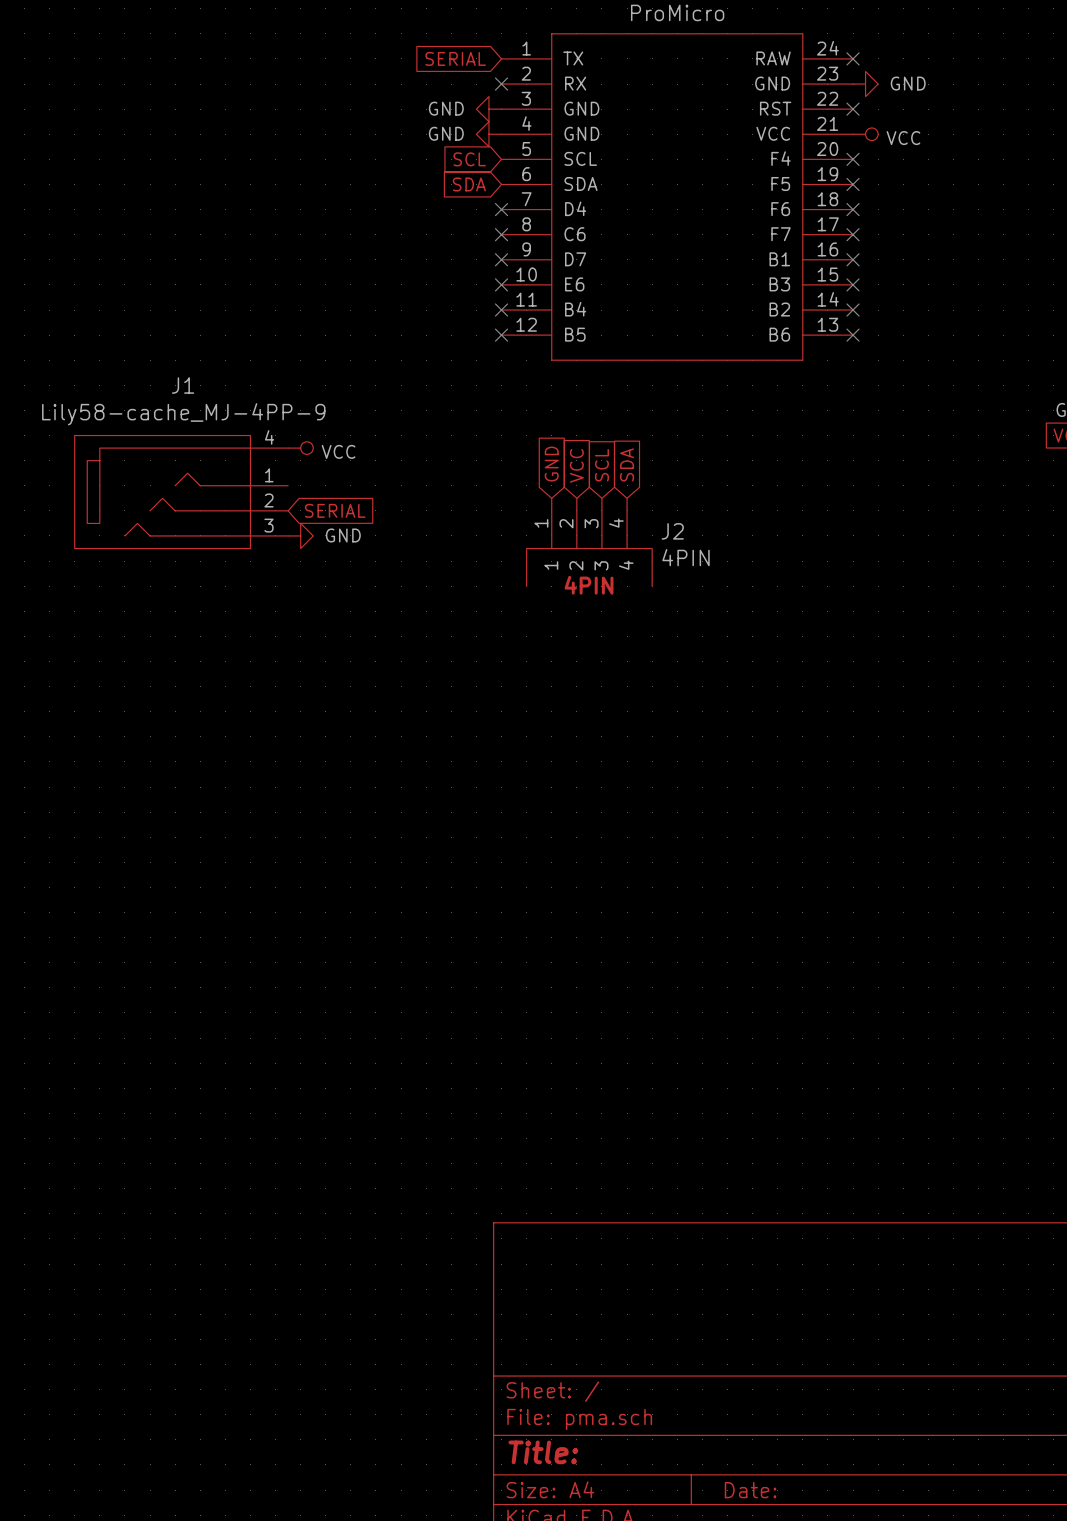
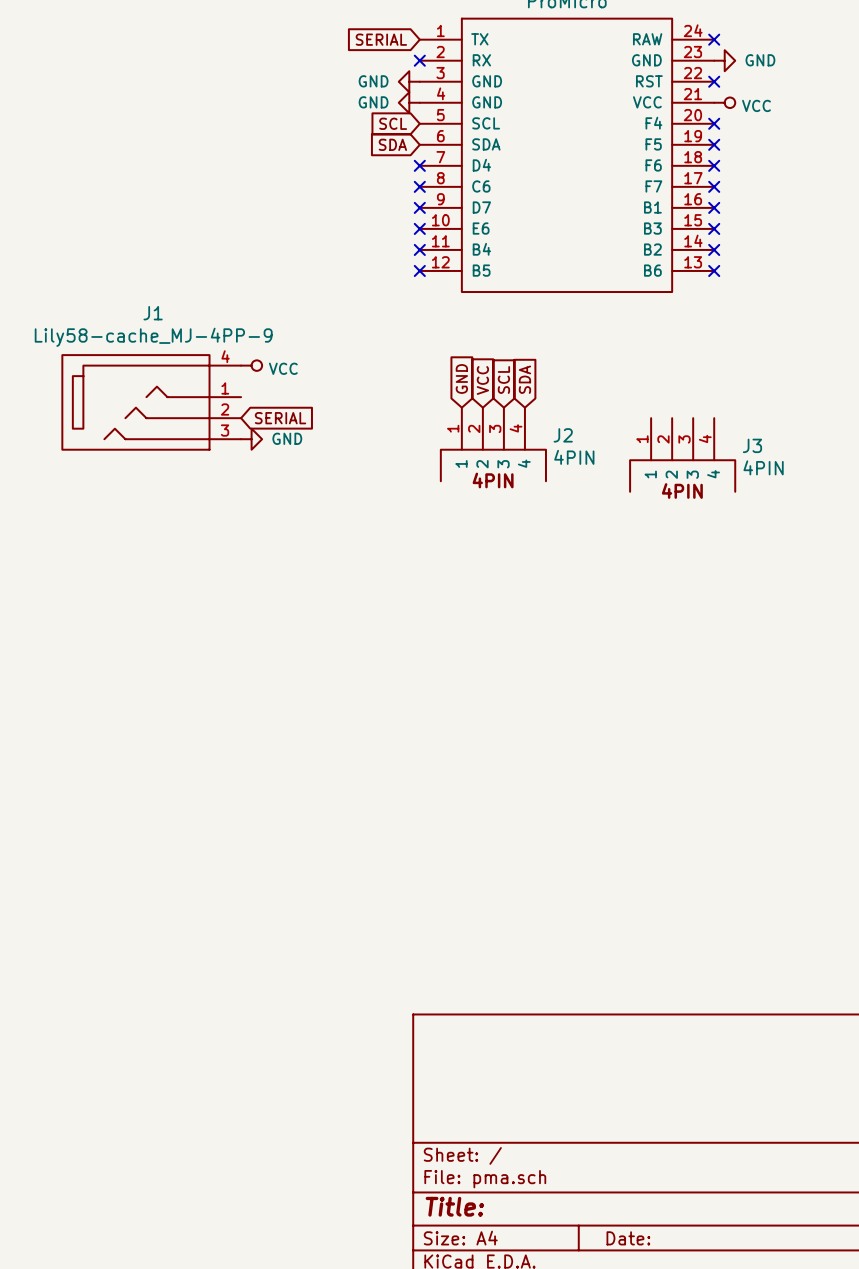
J3: none -> 4PIN (682, 454)

